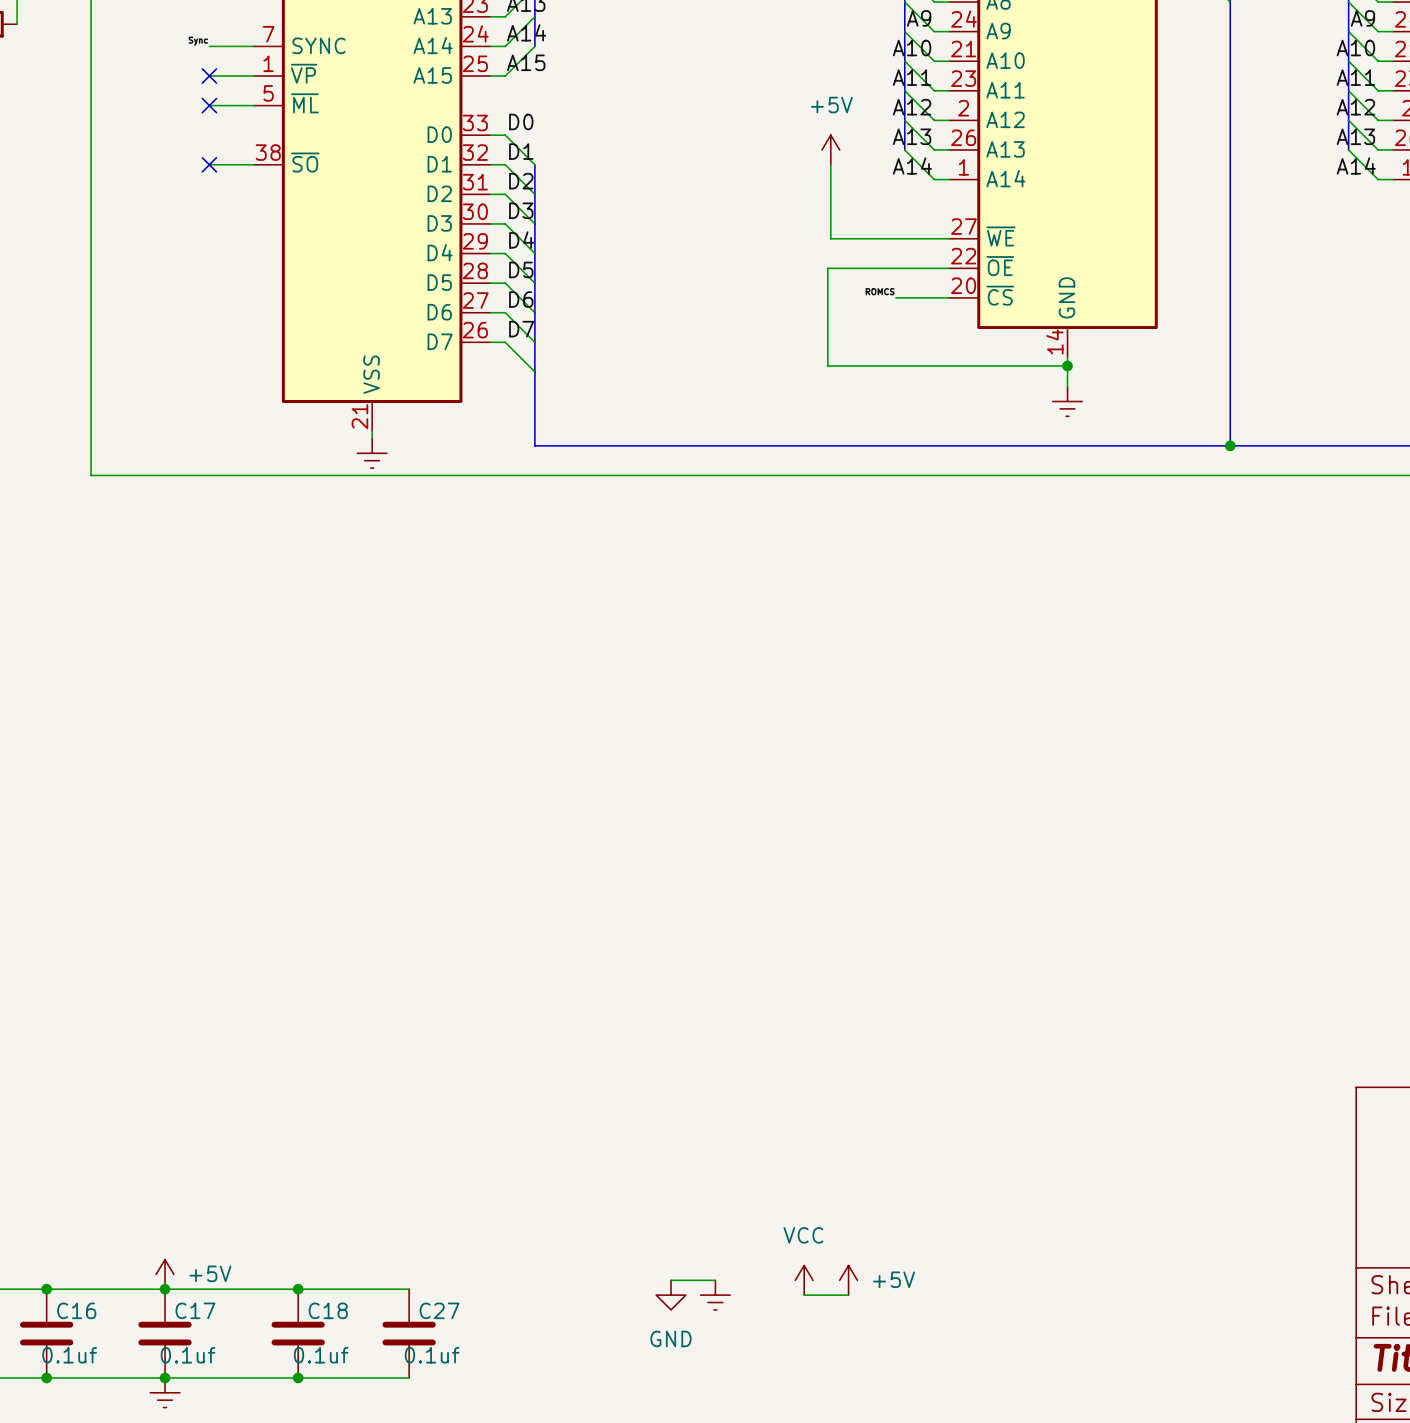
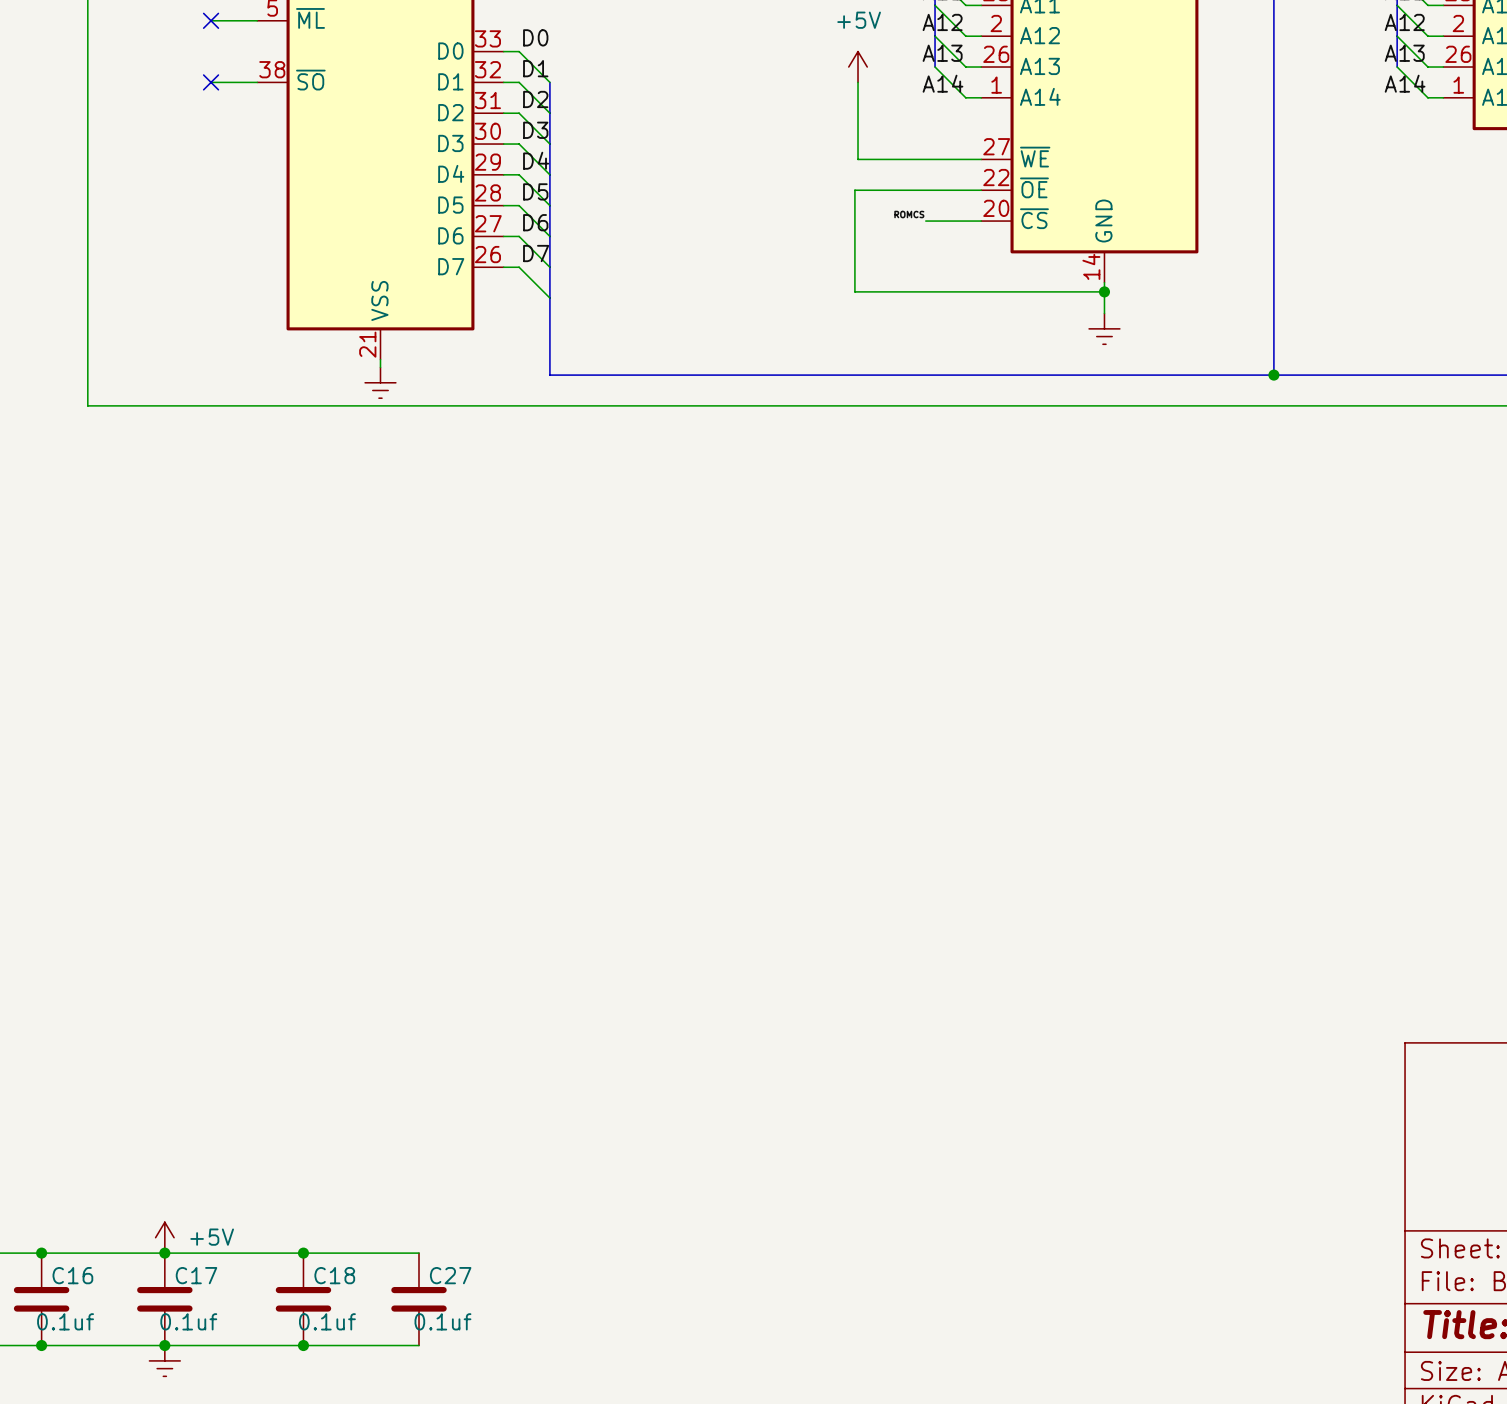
wire: (671, 1280) (715, 1280) -> none
power symbol: VCC (804, 1280) -> none
power symbol: +5V (848, 1280) -> none
power symbol: GND (671, 1295) -> none
power symbol: (715, 1295) -> none
wire: (804, 1295) (848, 1295) -> none

